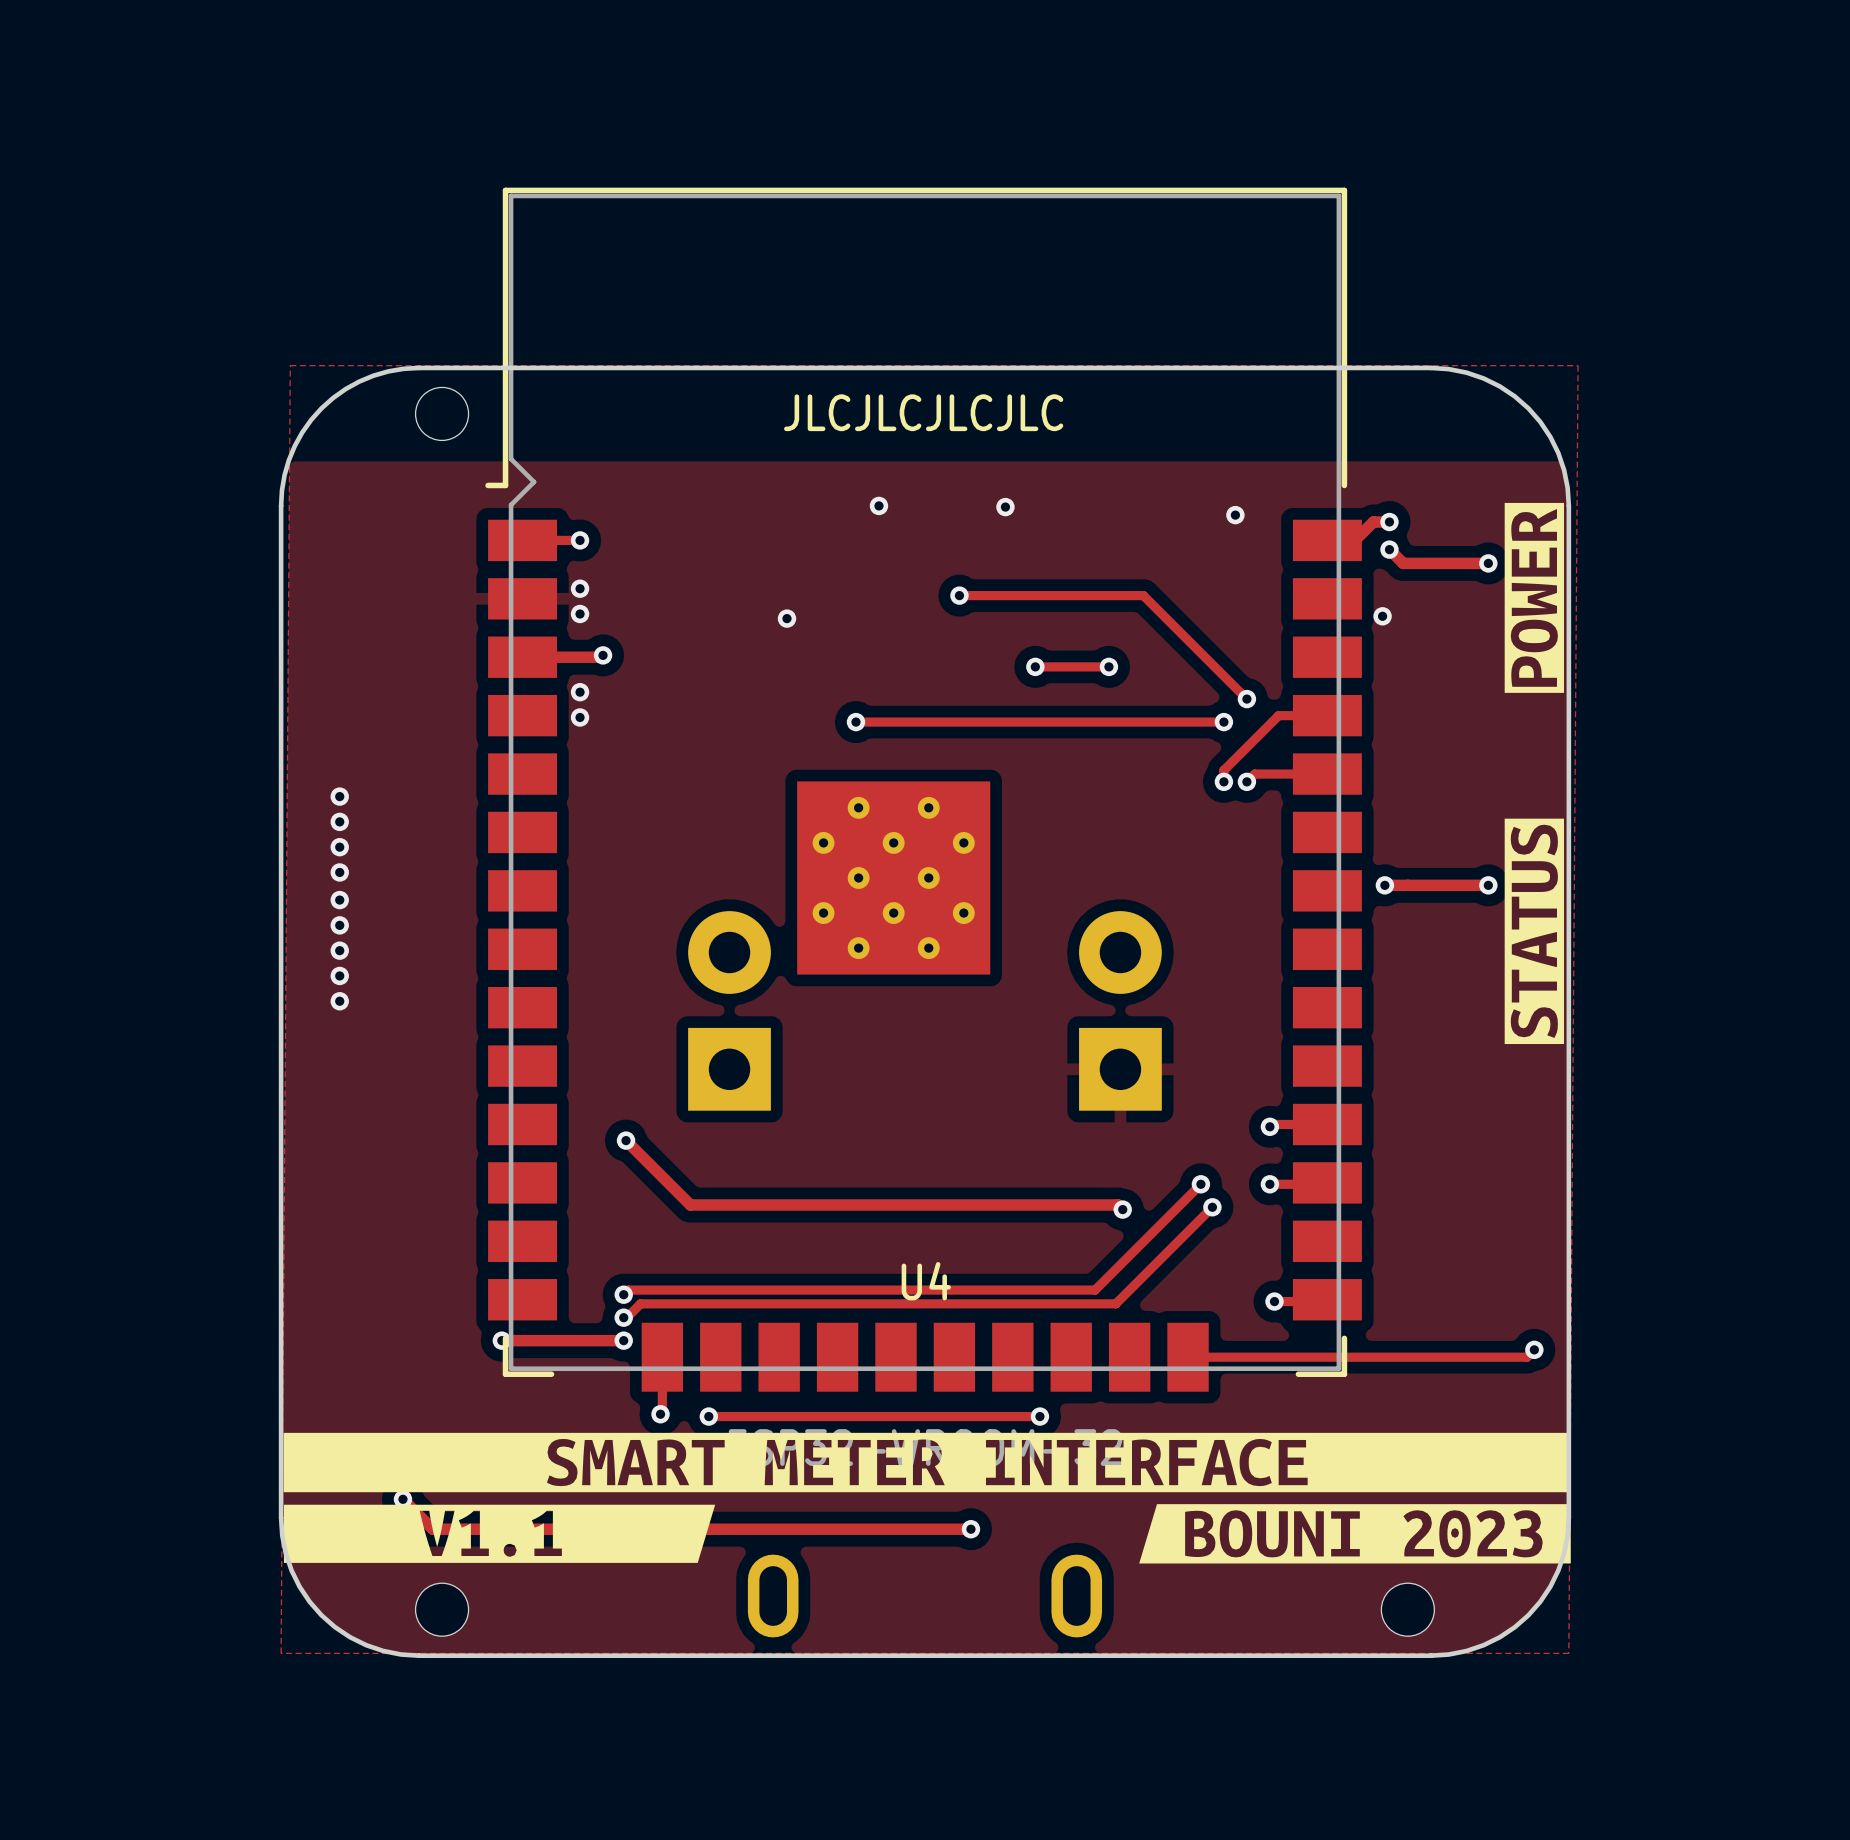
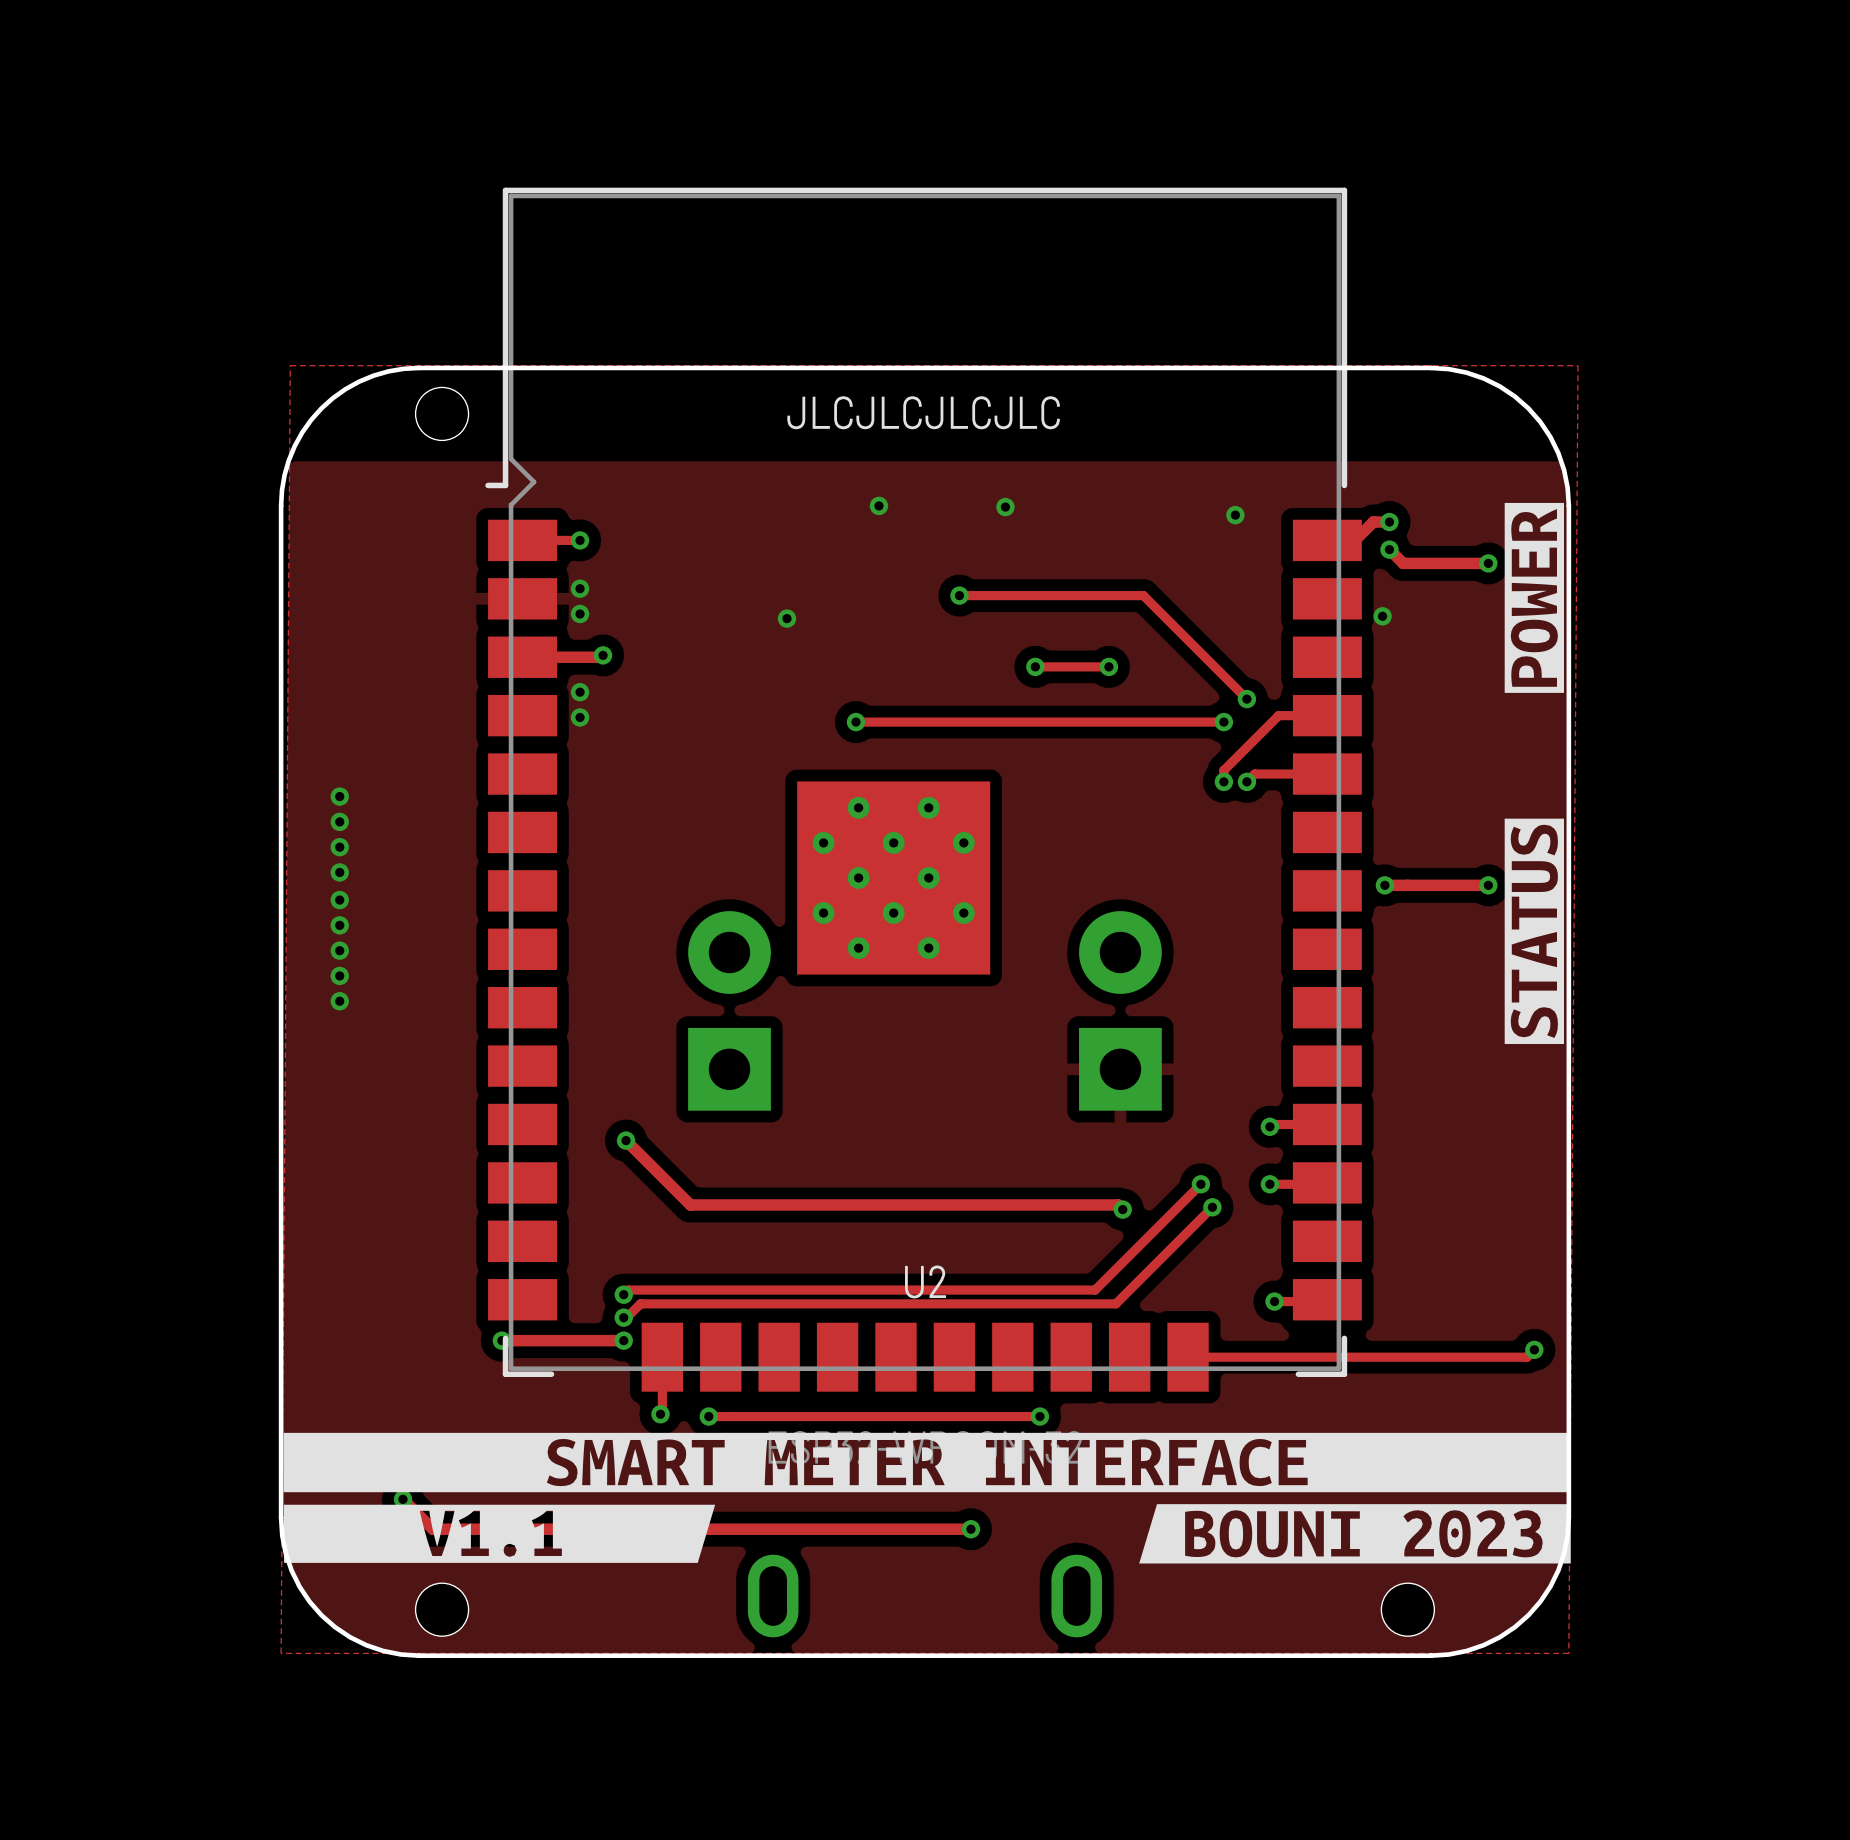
U4 name: U4 (926, 1281) -> U2 (925, 1281)

